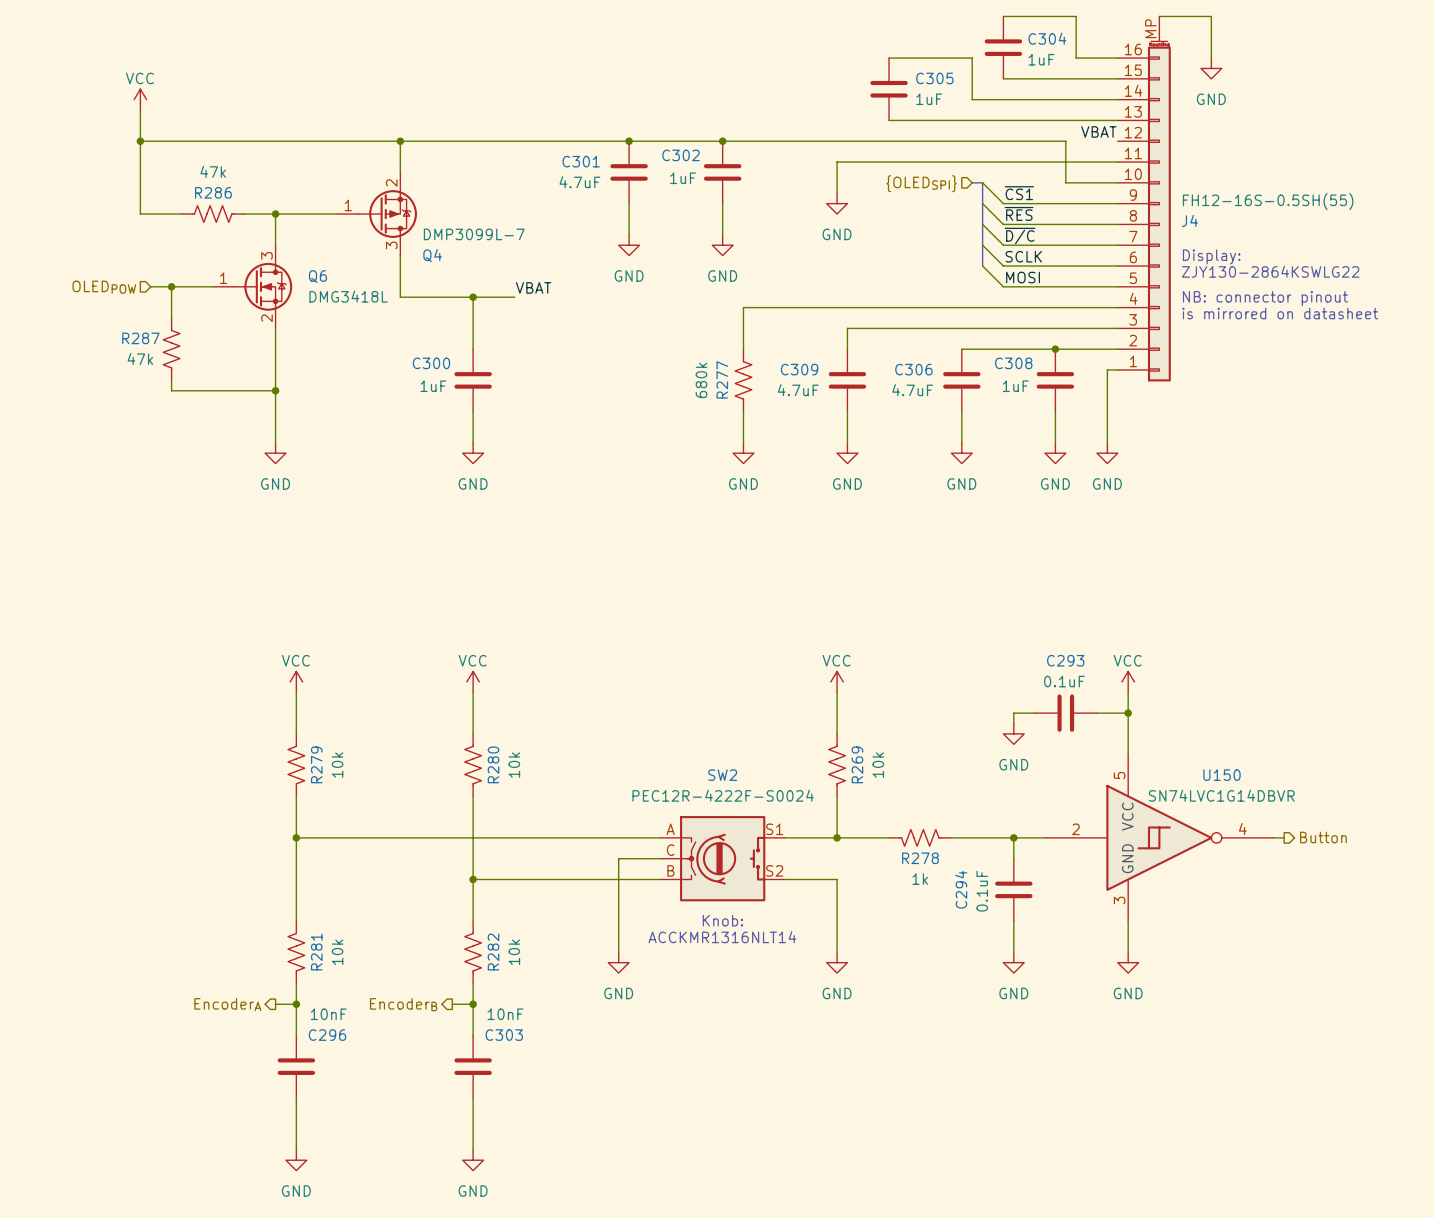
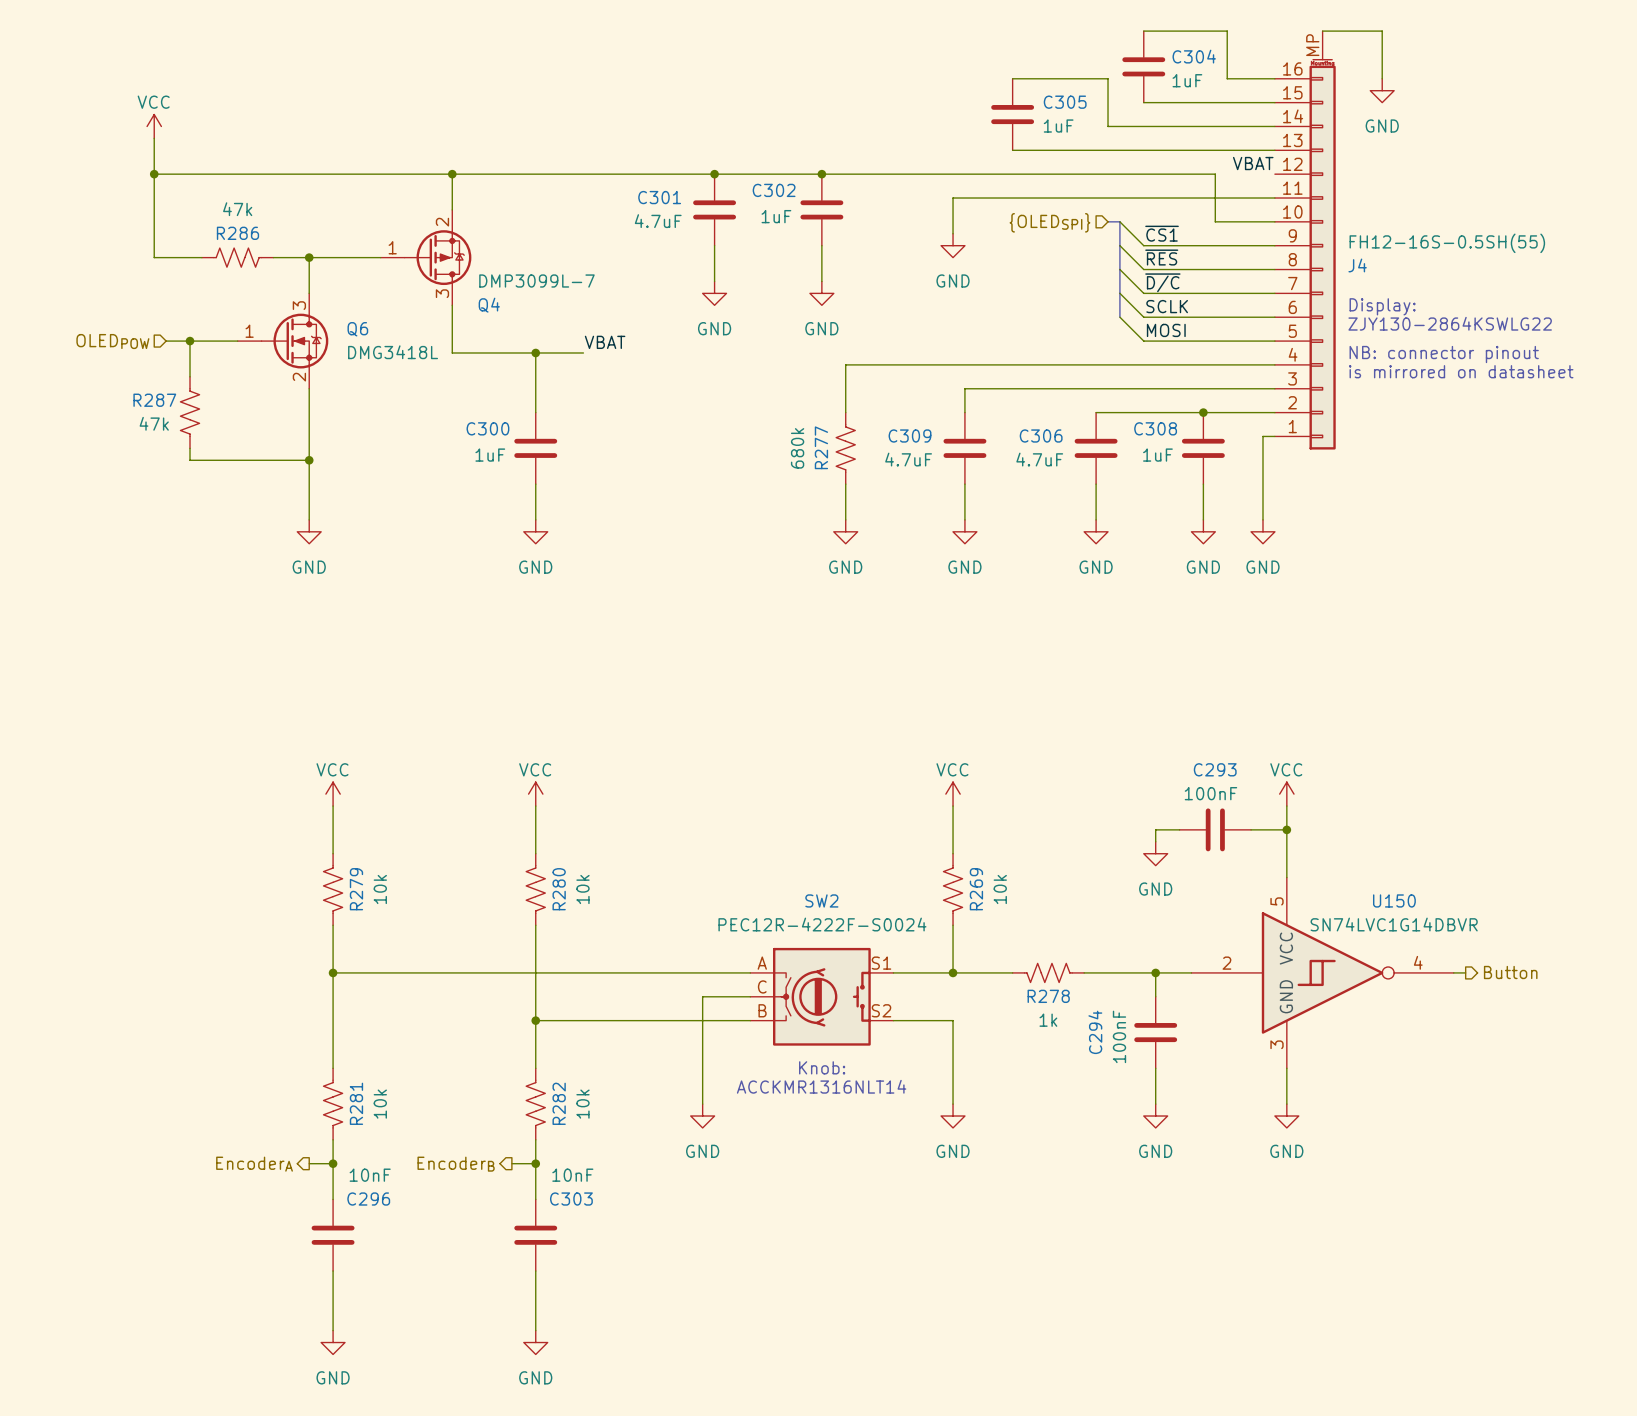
C293 value: 0.1uF (1064, 681) -> 100nF (1210, 793)
C294 value: 0.1uF (982, 891) -> 100nF (1119, 1036)

